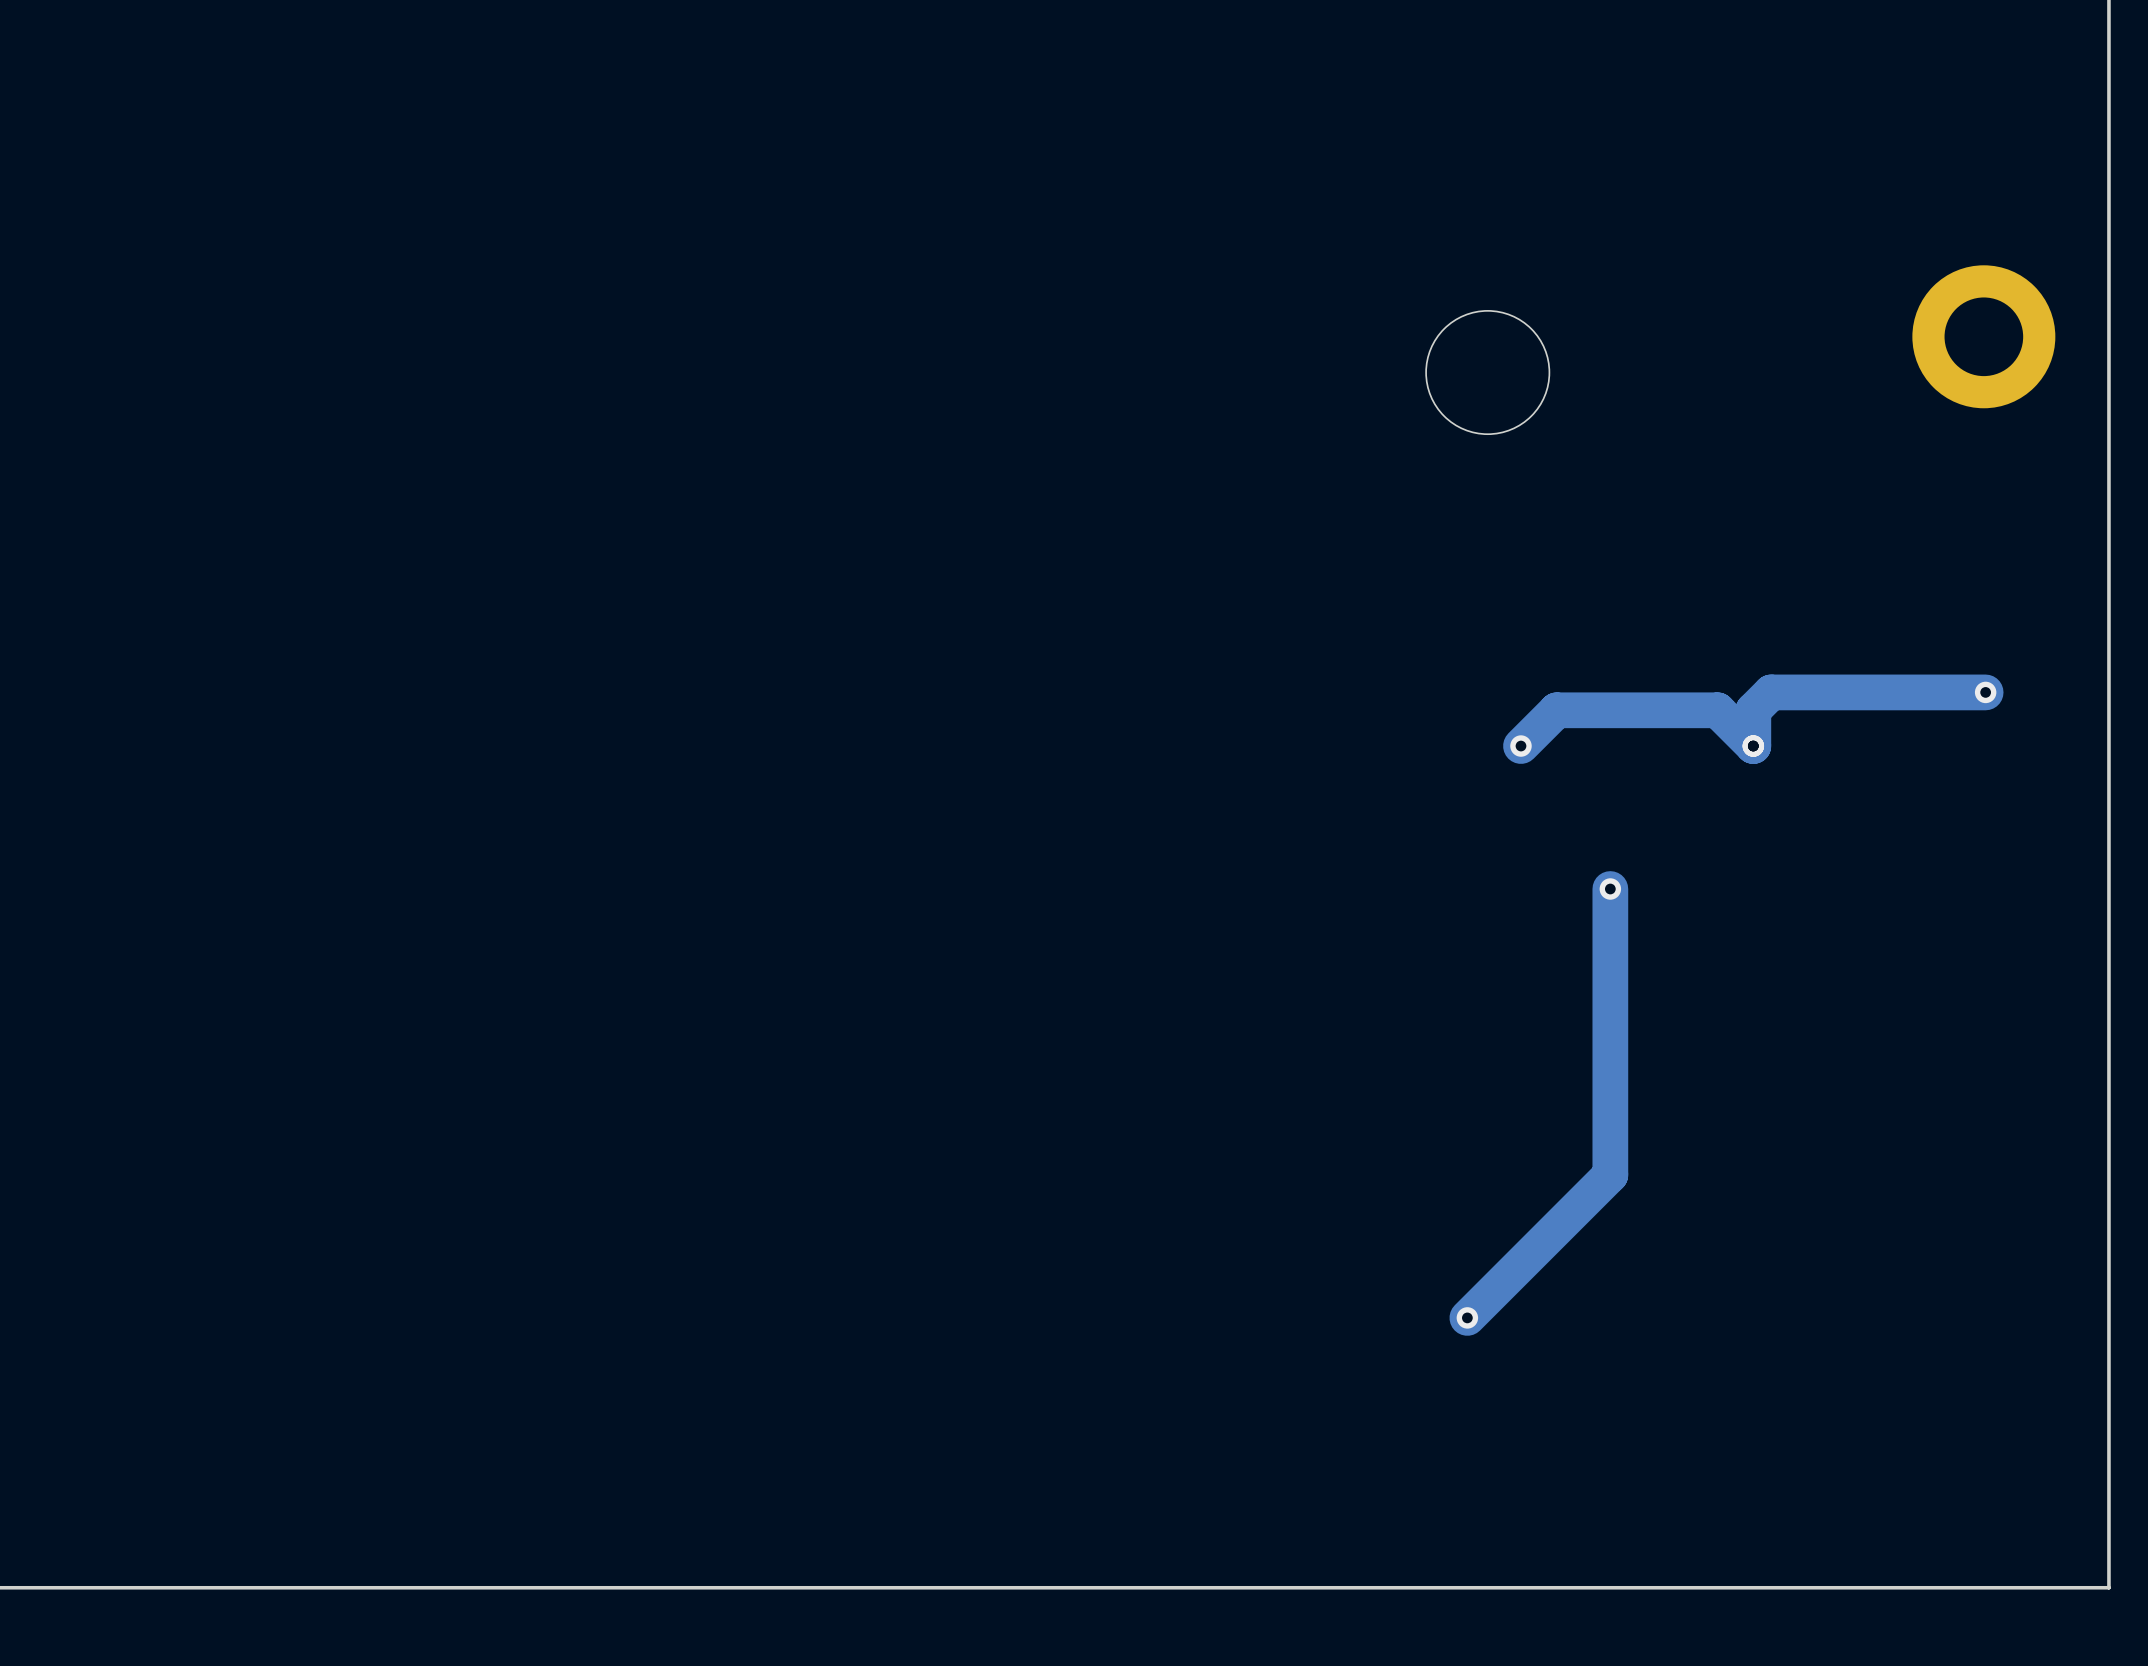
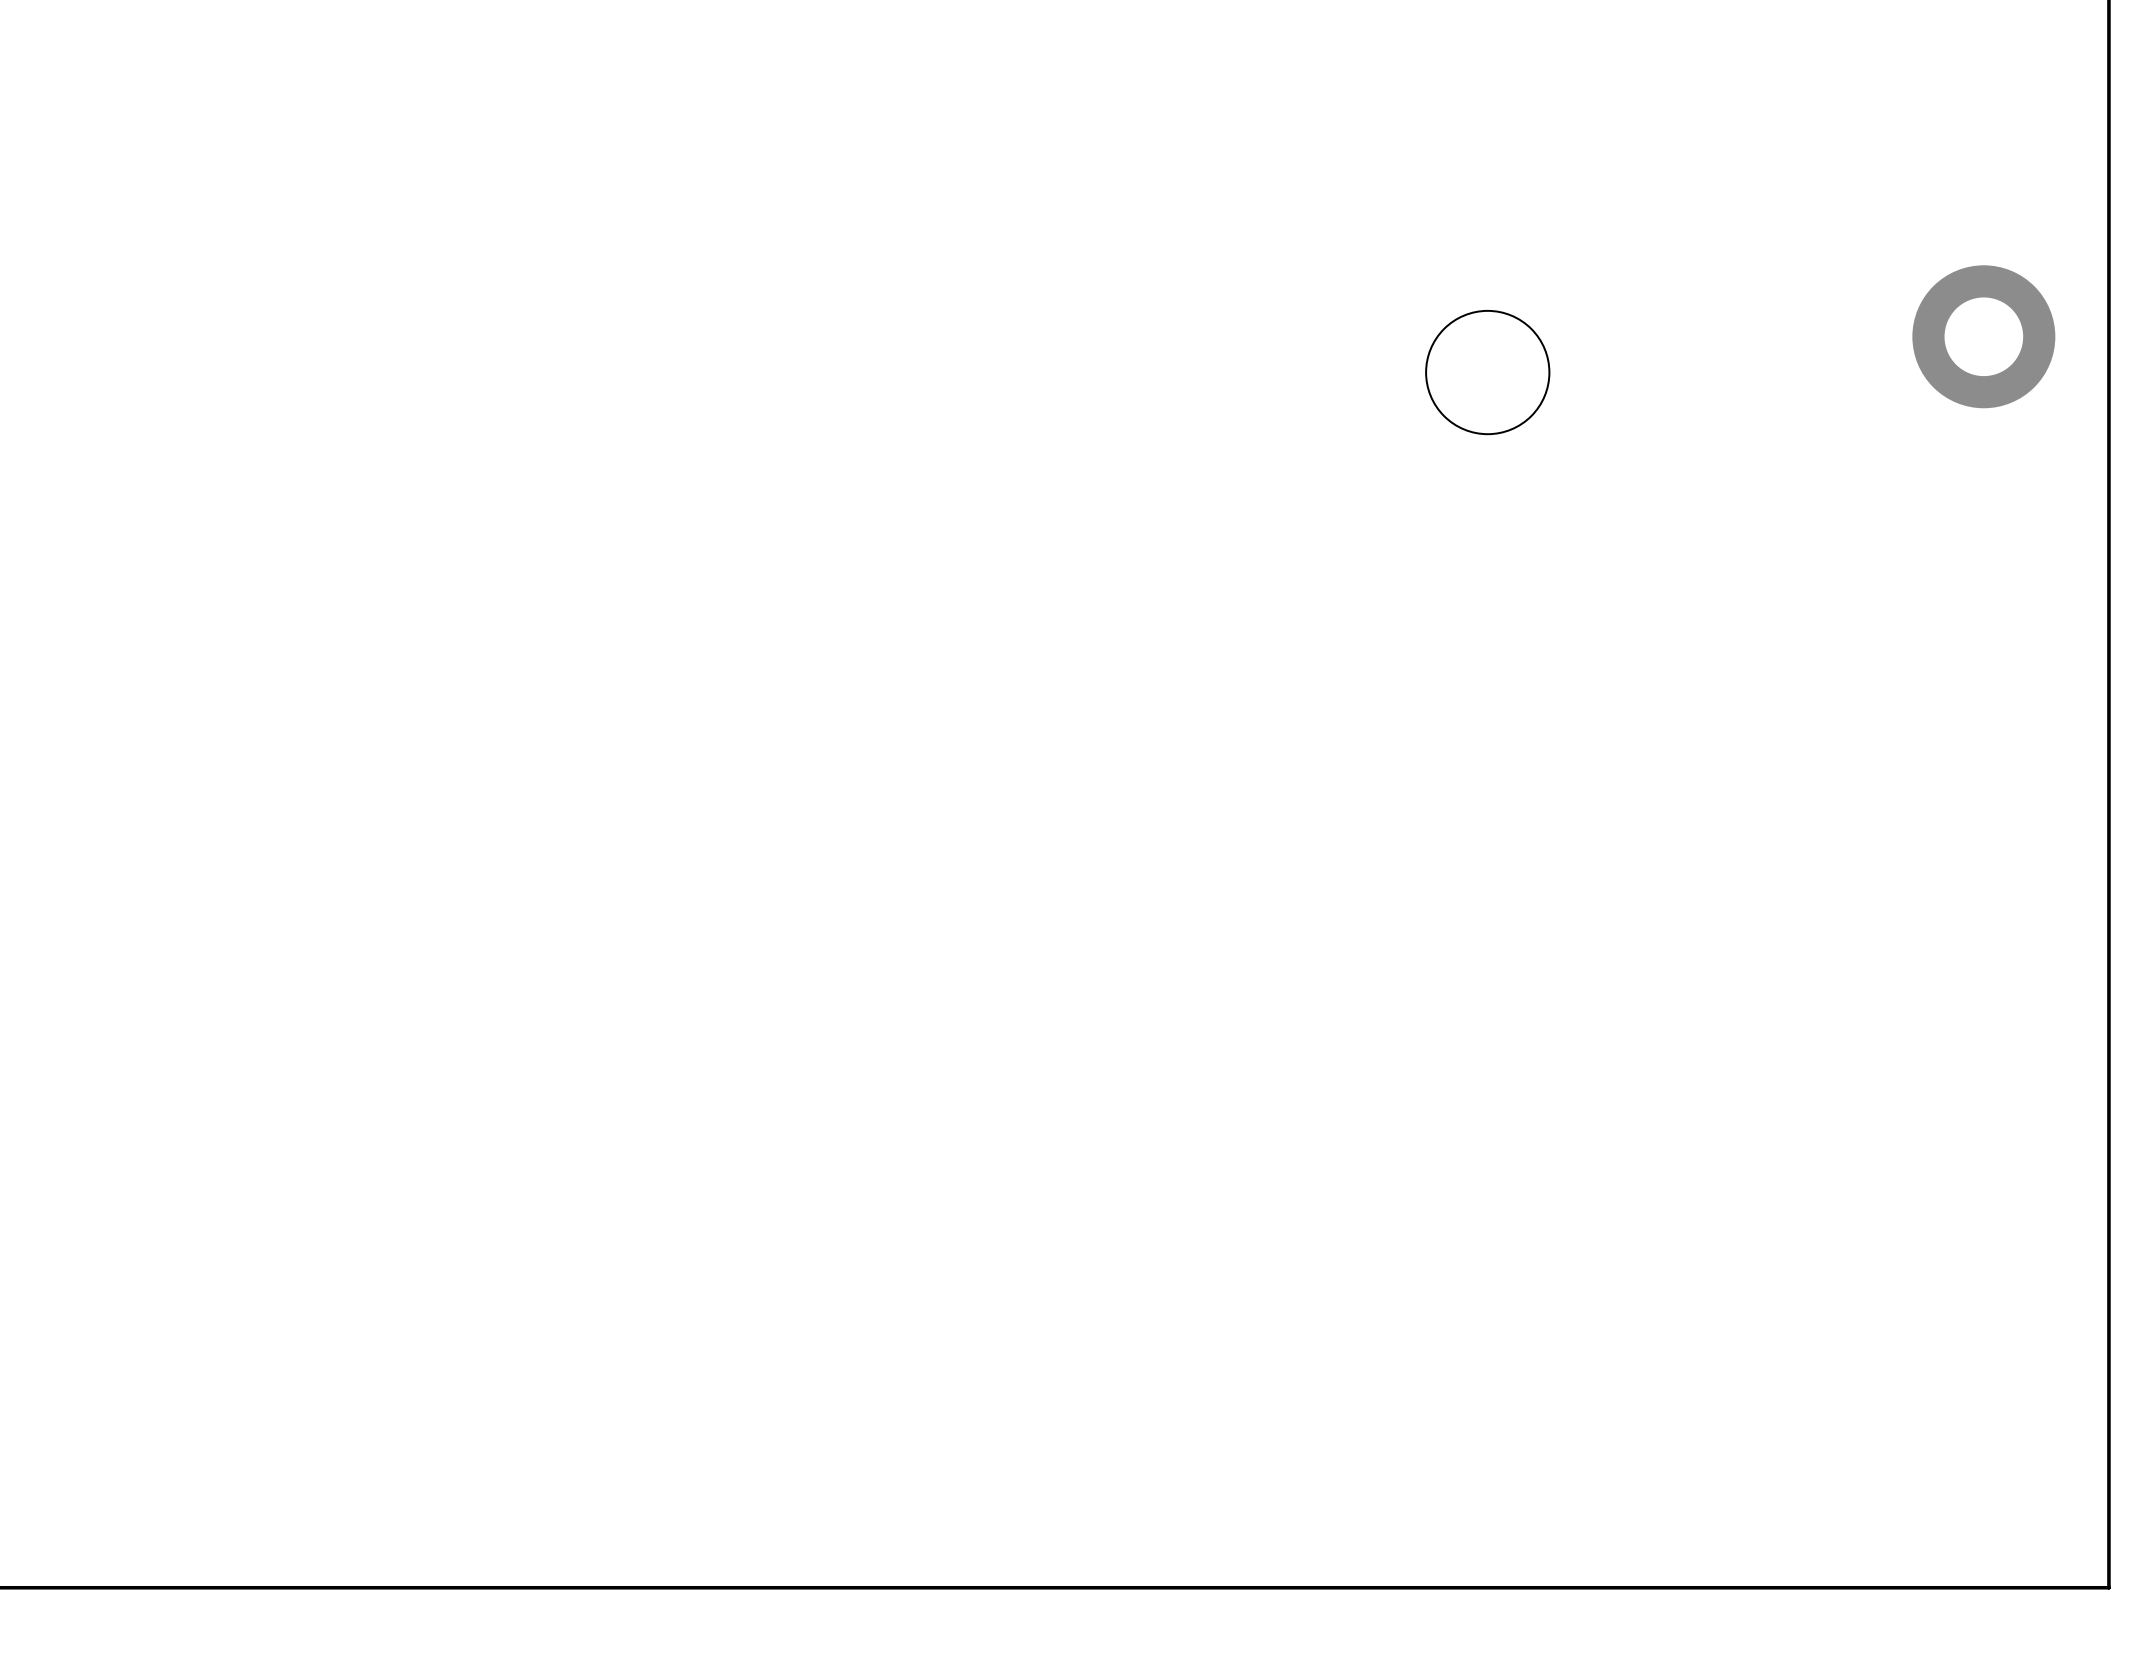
track: (1985, 692) (1771, 692) (1753, 710) (1753, 746) (1717, 710) (1556, 710) (1520, 746) -> none
via: (1985, 692) -> none
via: (1520, 746) -> none
via: (1753, 746) -> none
track: (1610, 889) (1610, 1174) (1467, 1317) -> none
via: (1610, 889) -> none
via: (1467, 1317) -> none

